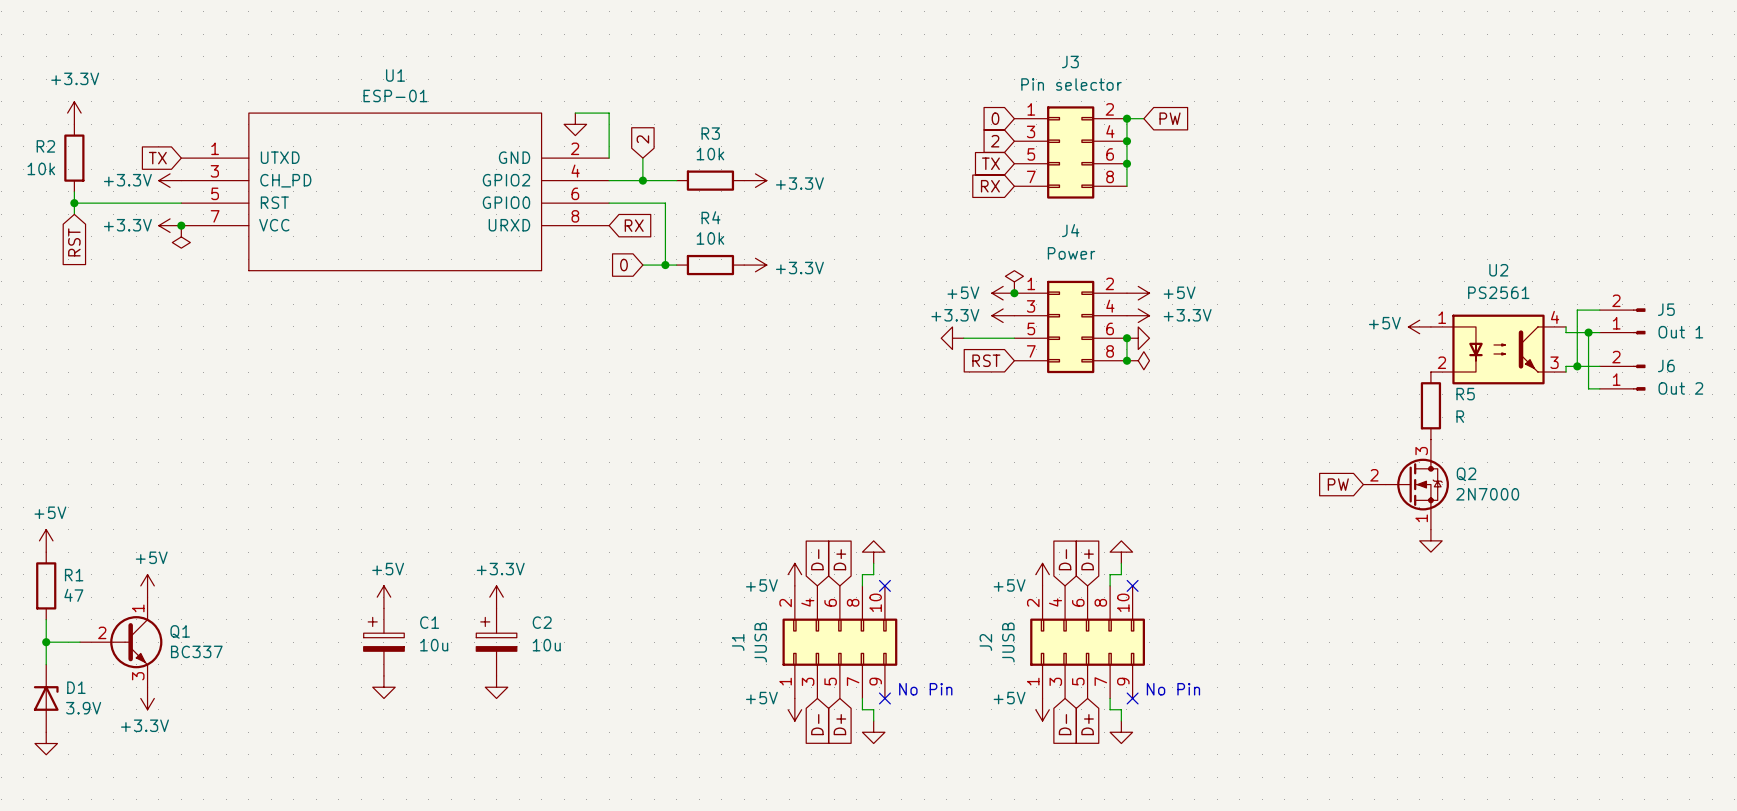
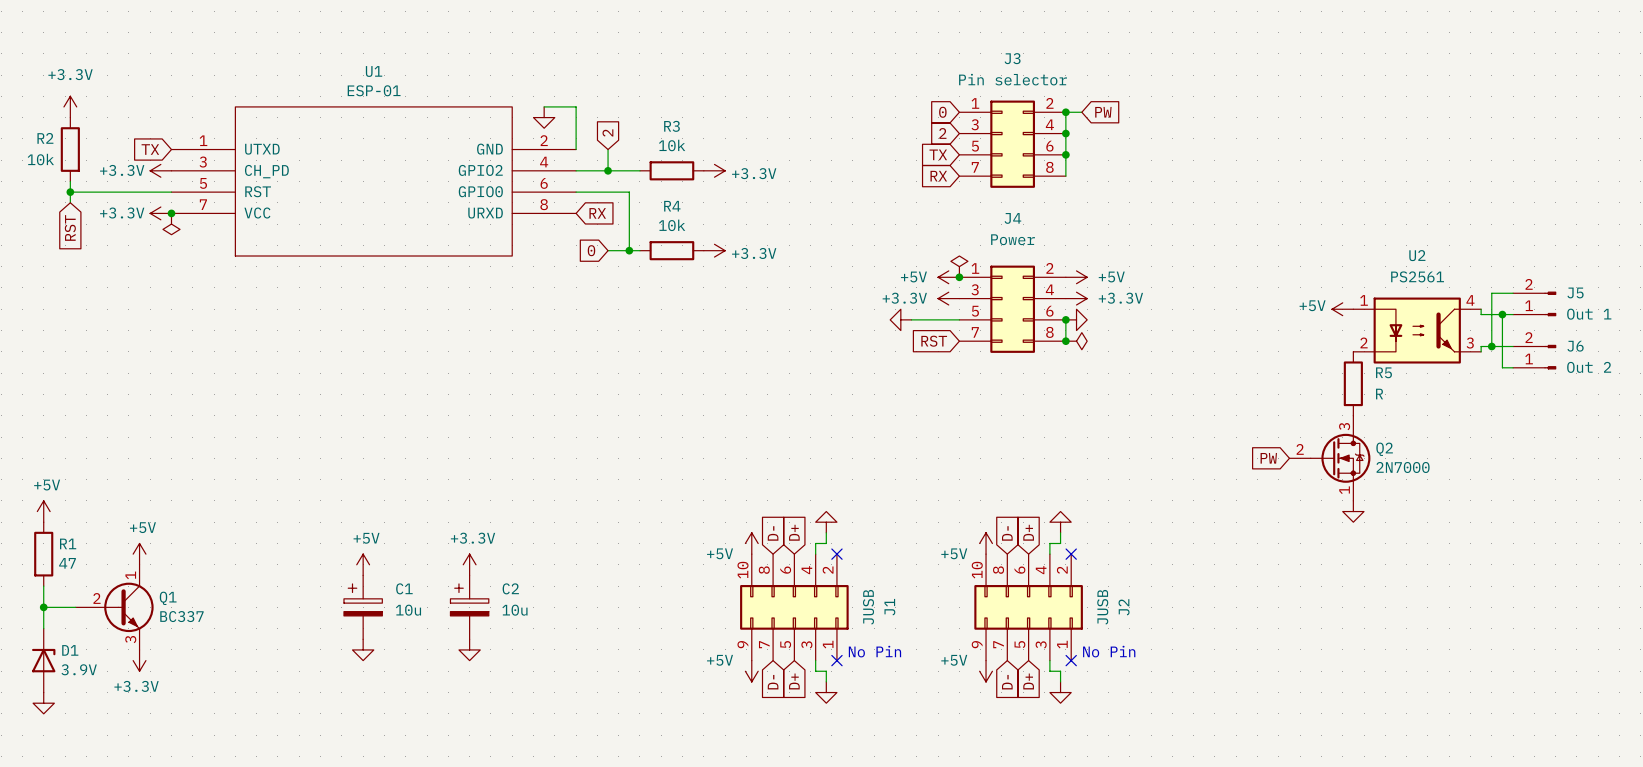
J1 flip: as is (839, 642) -> left-right (794, 607)
J2 flip: as is (1087, 642) -> left-right (1028, 607)

